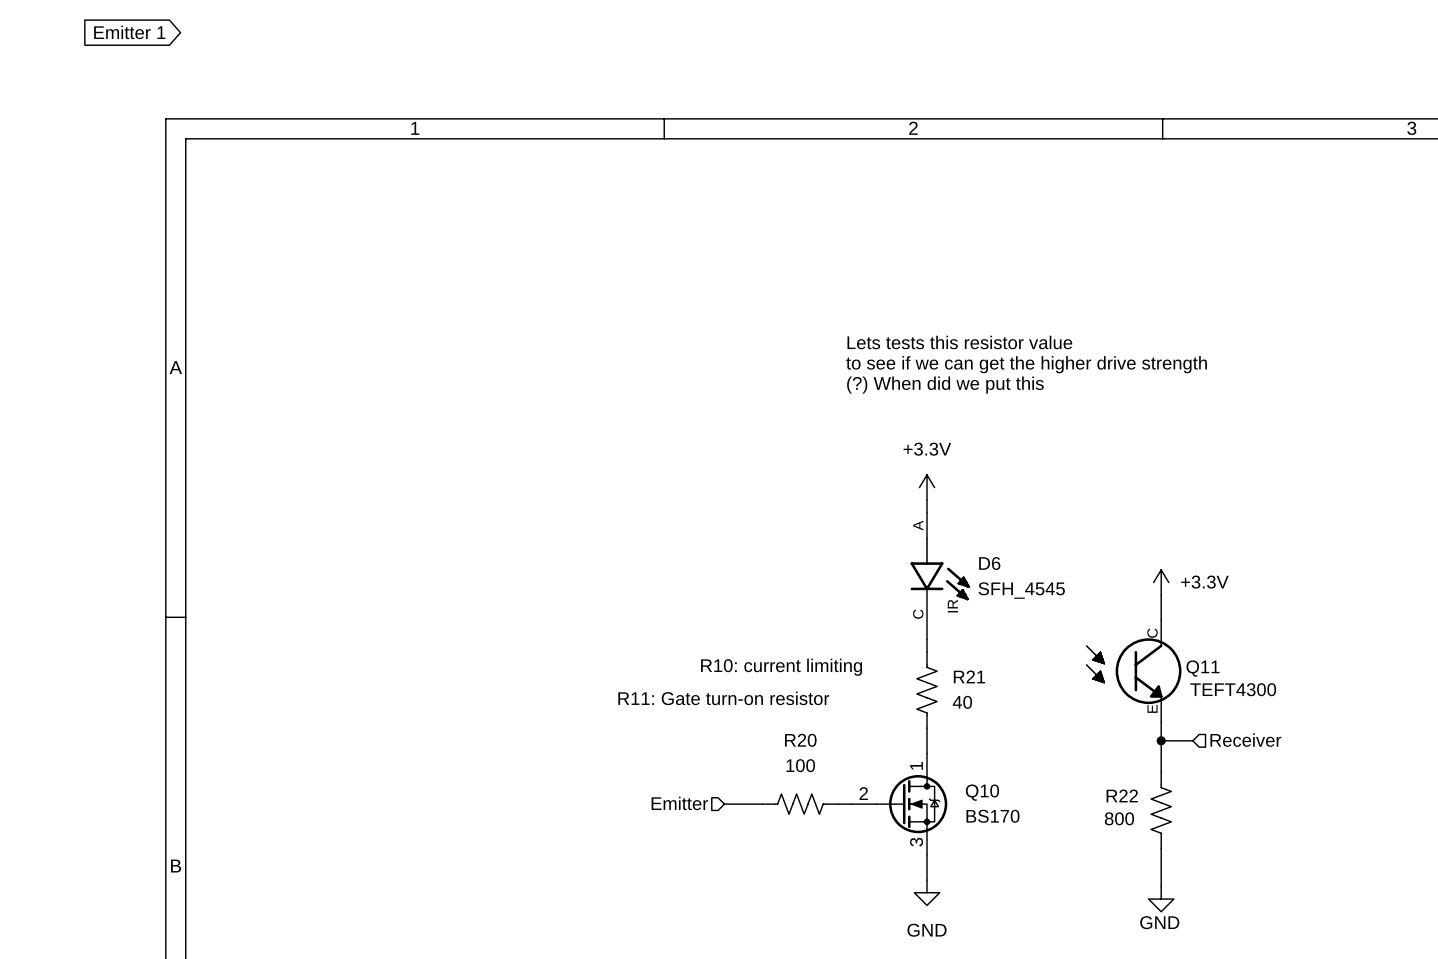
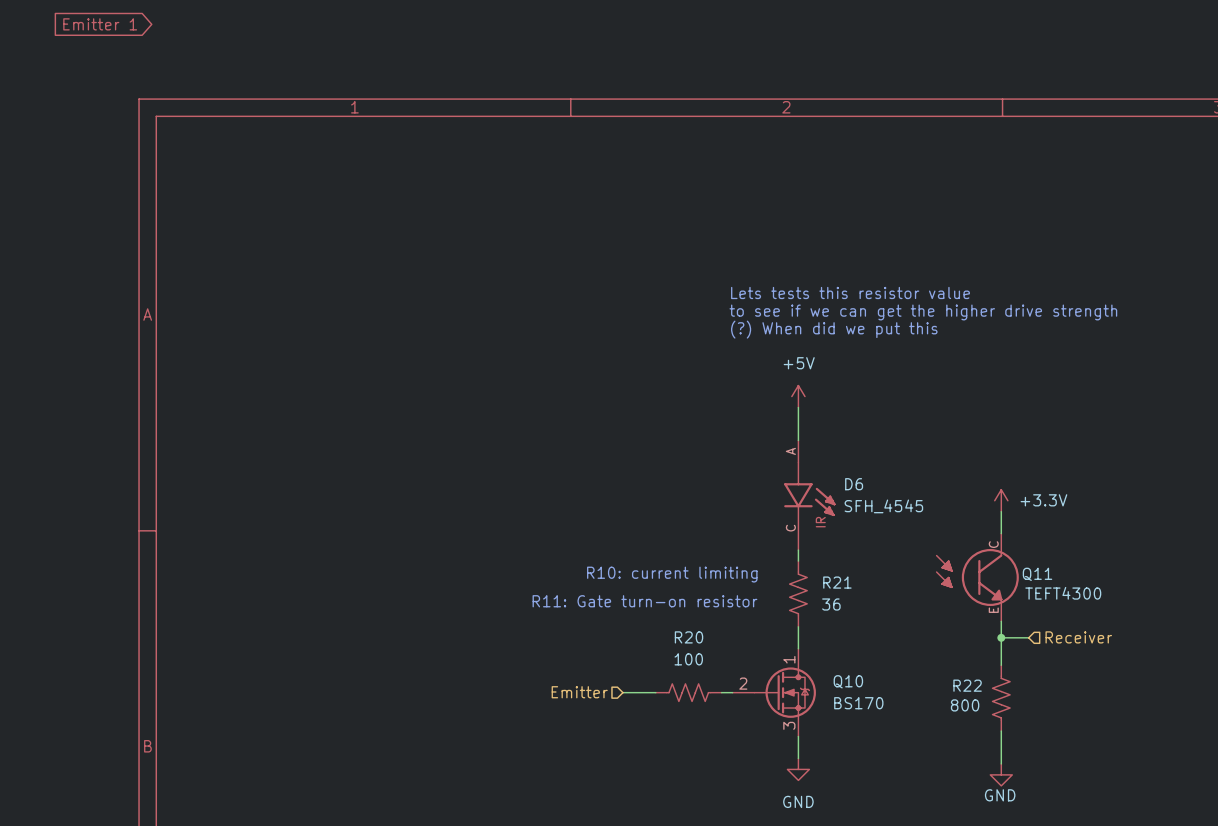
power symbol: none -> +5V (798, 396)
power symbol: +3.3V (927, 487) -> none
R21 value: 40 (962, 702) -> 36 (831, 604)

